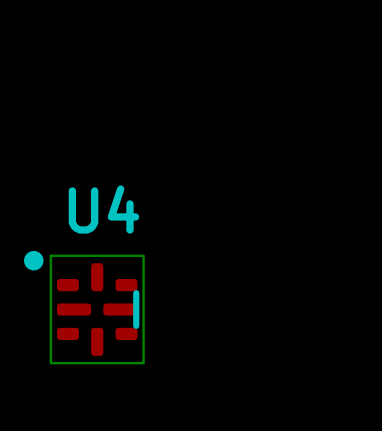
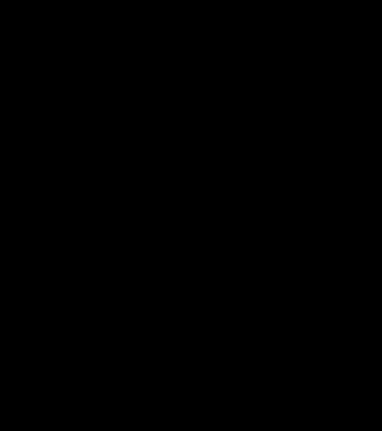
U4: (84, 307) -> none

